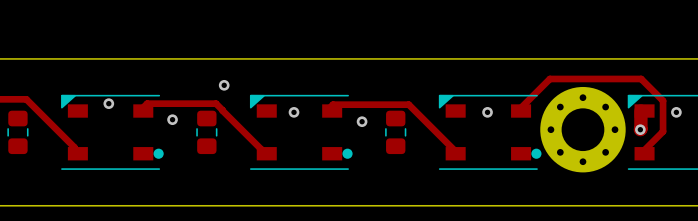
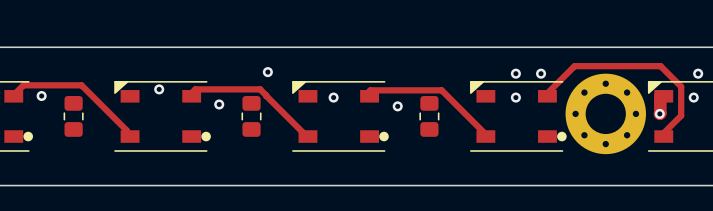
via: none -> (515, 73)
via: none -> (541, 73)
via: none -> (698, 73)

